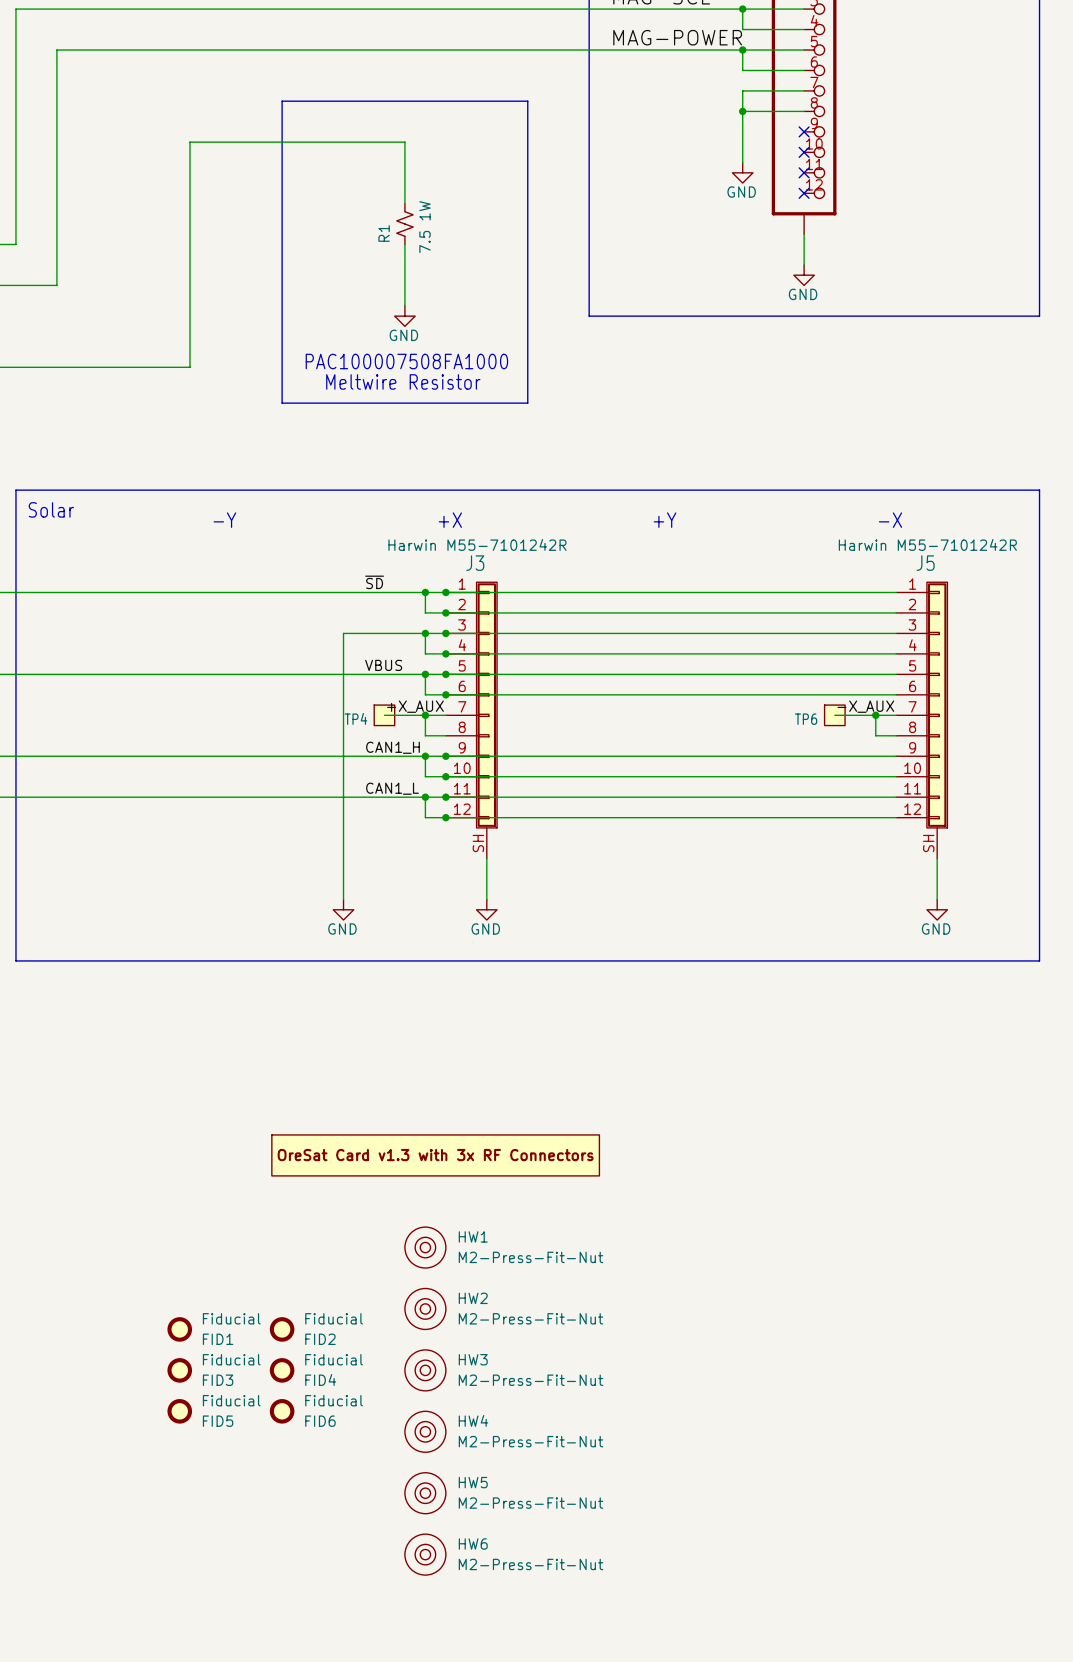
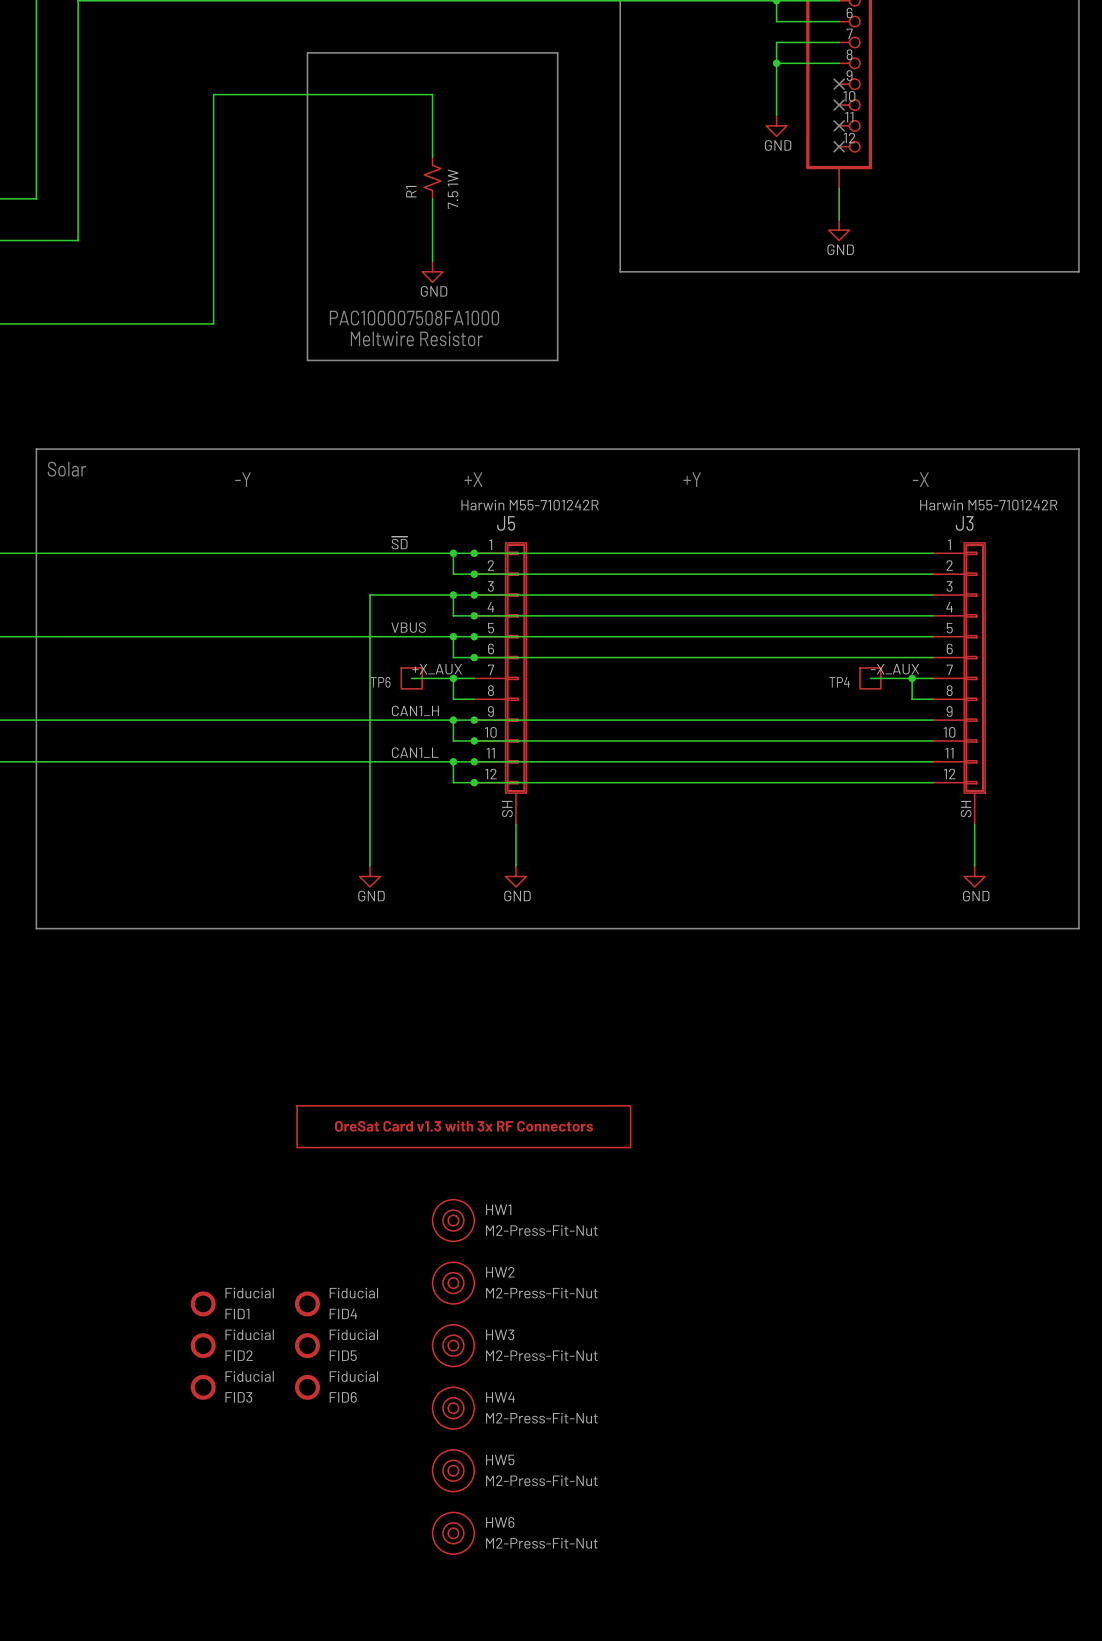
J3 name: J3 (475, 563) -> J5 (506, 523)
J5 name: J5 (925, 563) -> J3 (964, 523)
TP4 name: TP4 (355, 718) -> TP6 (380, 682)
TP6 name: TP6 (806, 719) -> TP4 (839, 682)
FID2 name: FID2 (320, 1339) -> FID4 (343, 1313)
FID4 name: FID4 (320, 1379) -> FID5 (343, 1355)
FID3 name: FID3 (218, 1380) -> FID2 (239, 1355)
FID5 name: FID5 (218, 1421) -> FID3 (238, 1397)

